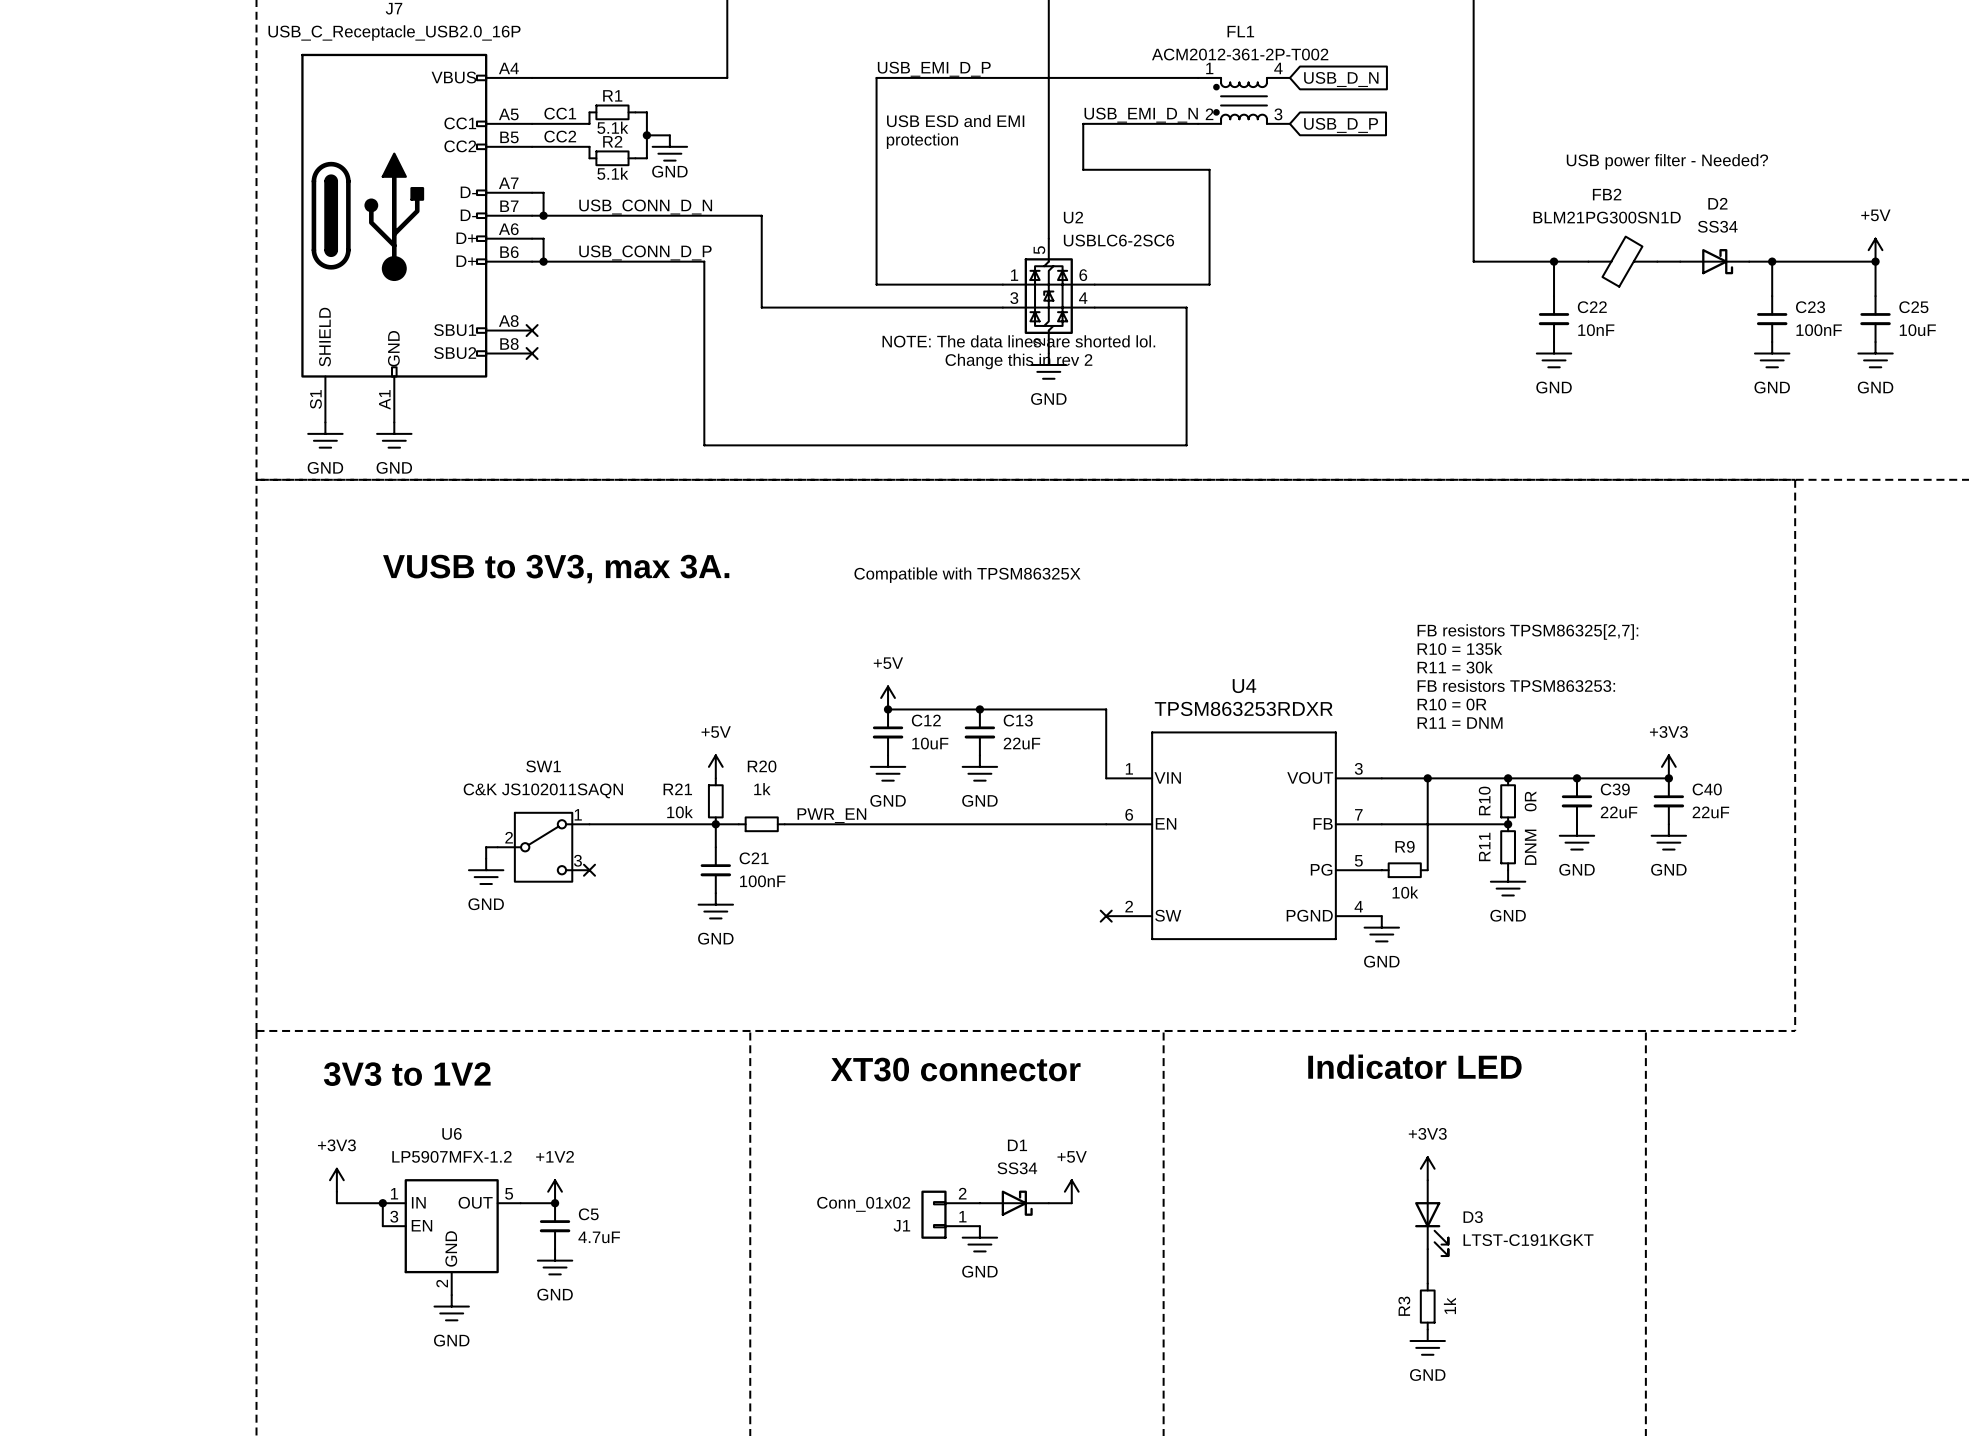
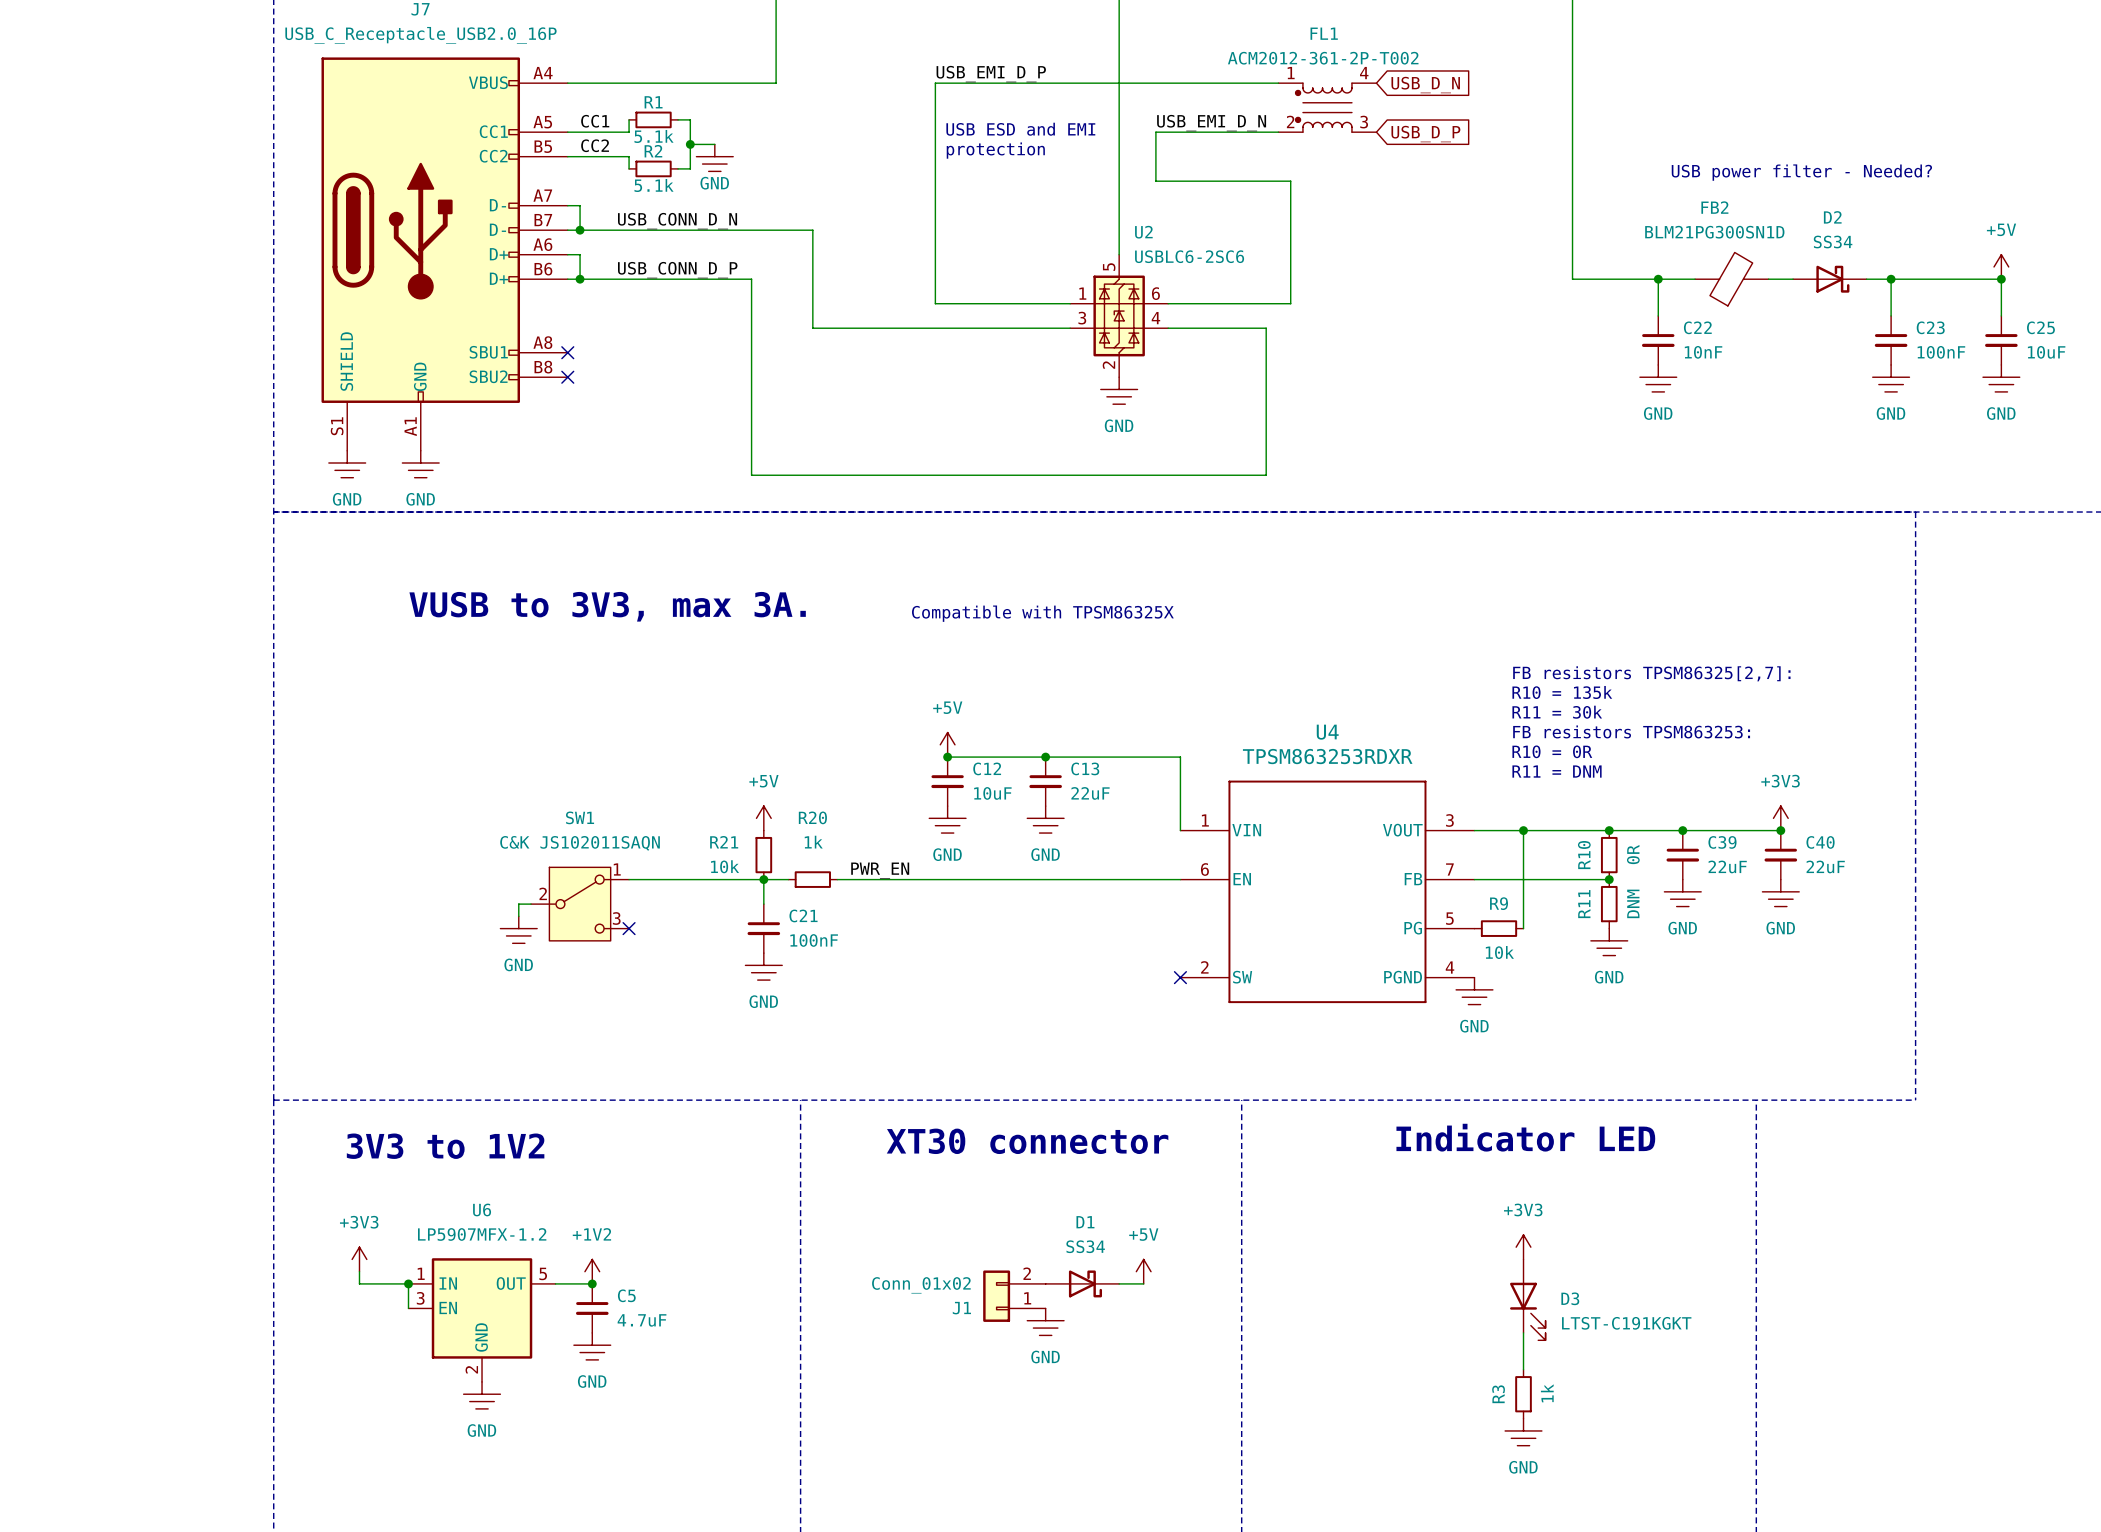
text: NOTE: The data lines are shorted lol. (1018, 341) -> none
text: Change this in rev 2 (1018, 361) -> none

